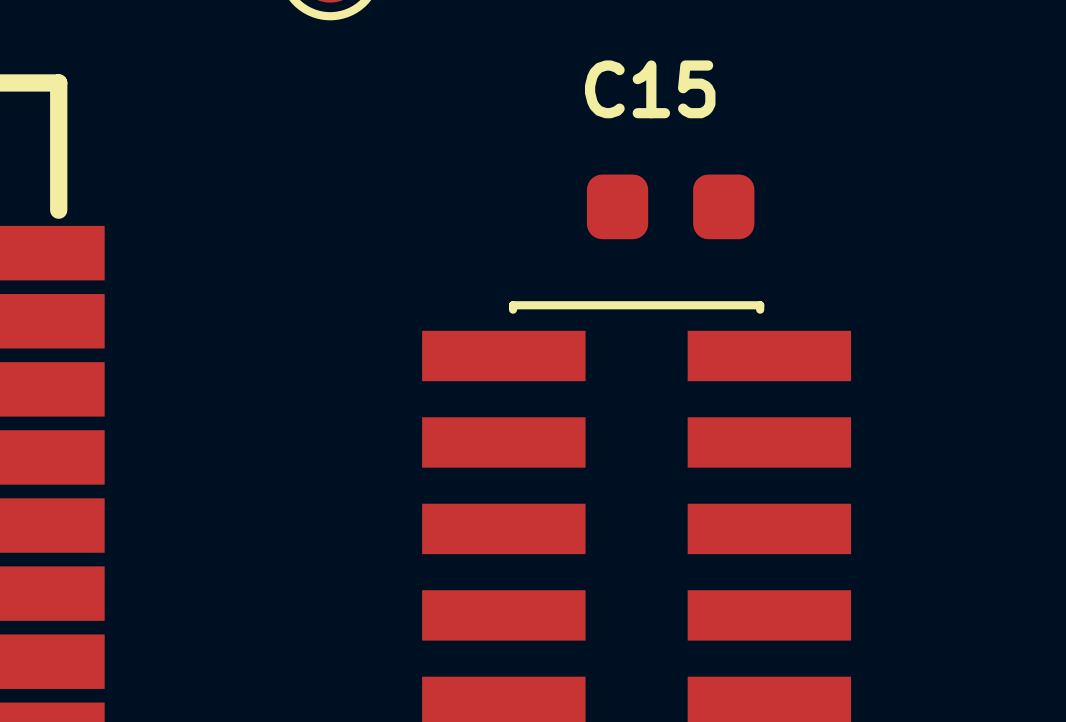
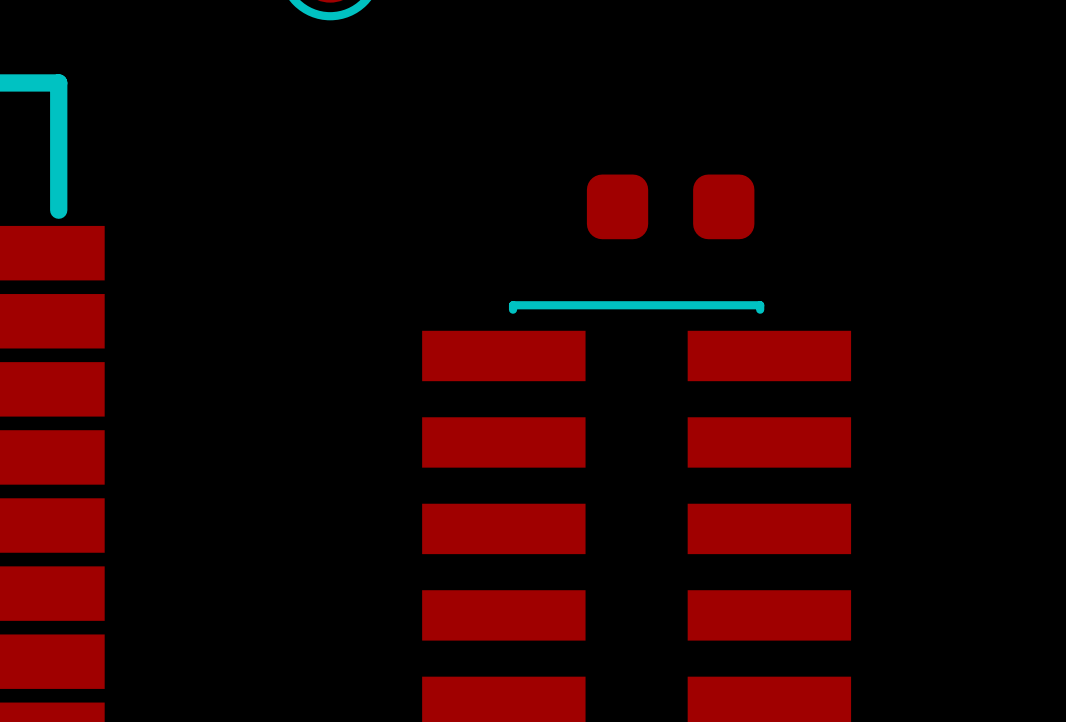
C15 name: C15 (650, 89) -> none

